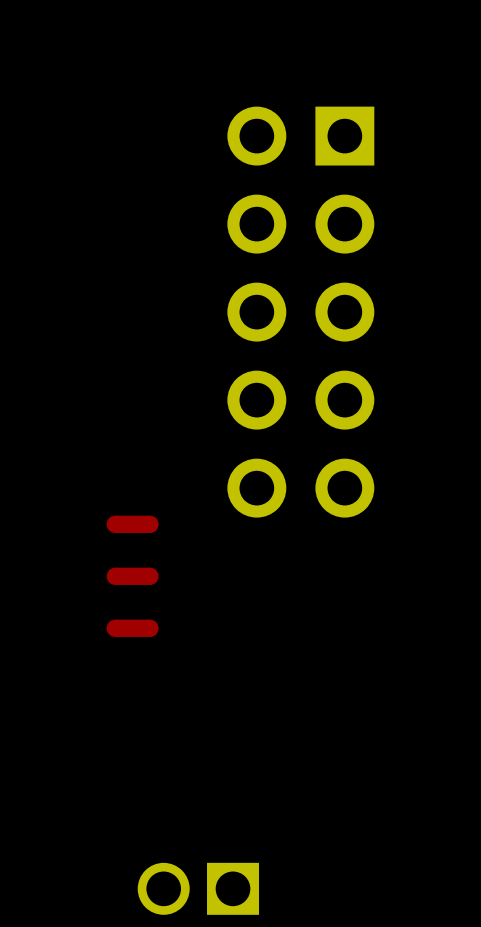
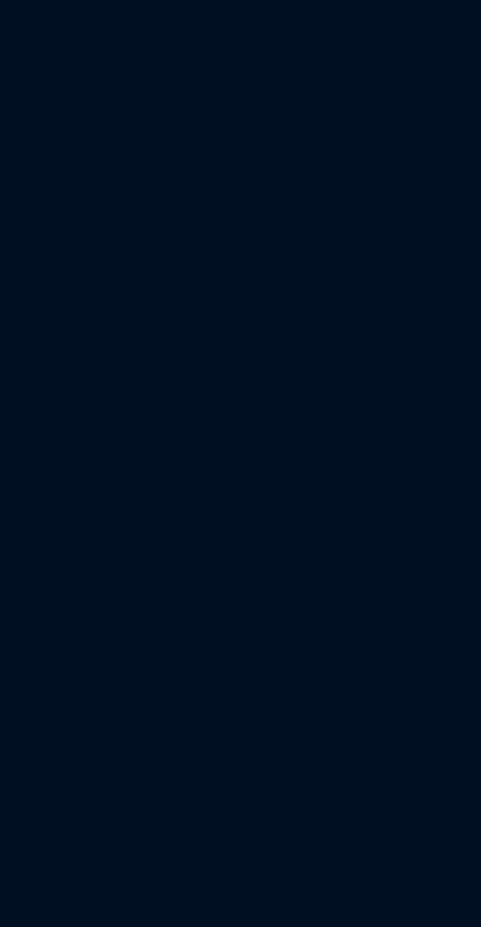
part: (300, 312) -> none
part: (132, 524) -> none
part: (132, 576) -> none
part: (132, 628) -> none
part: (198, 888) -> none

